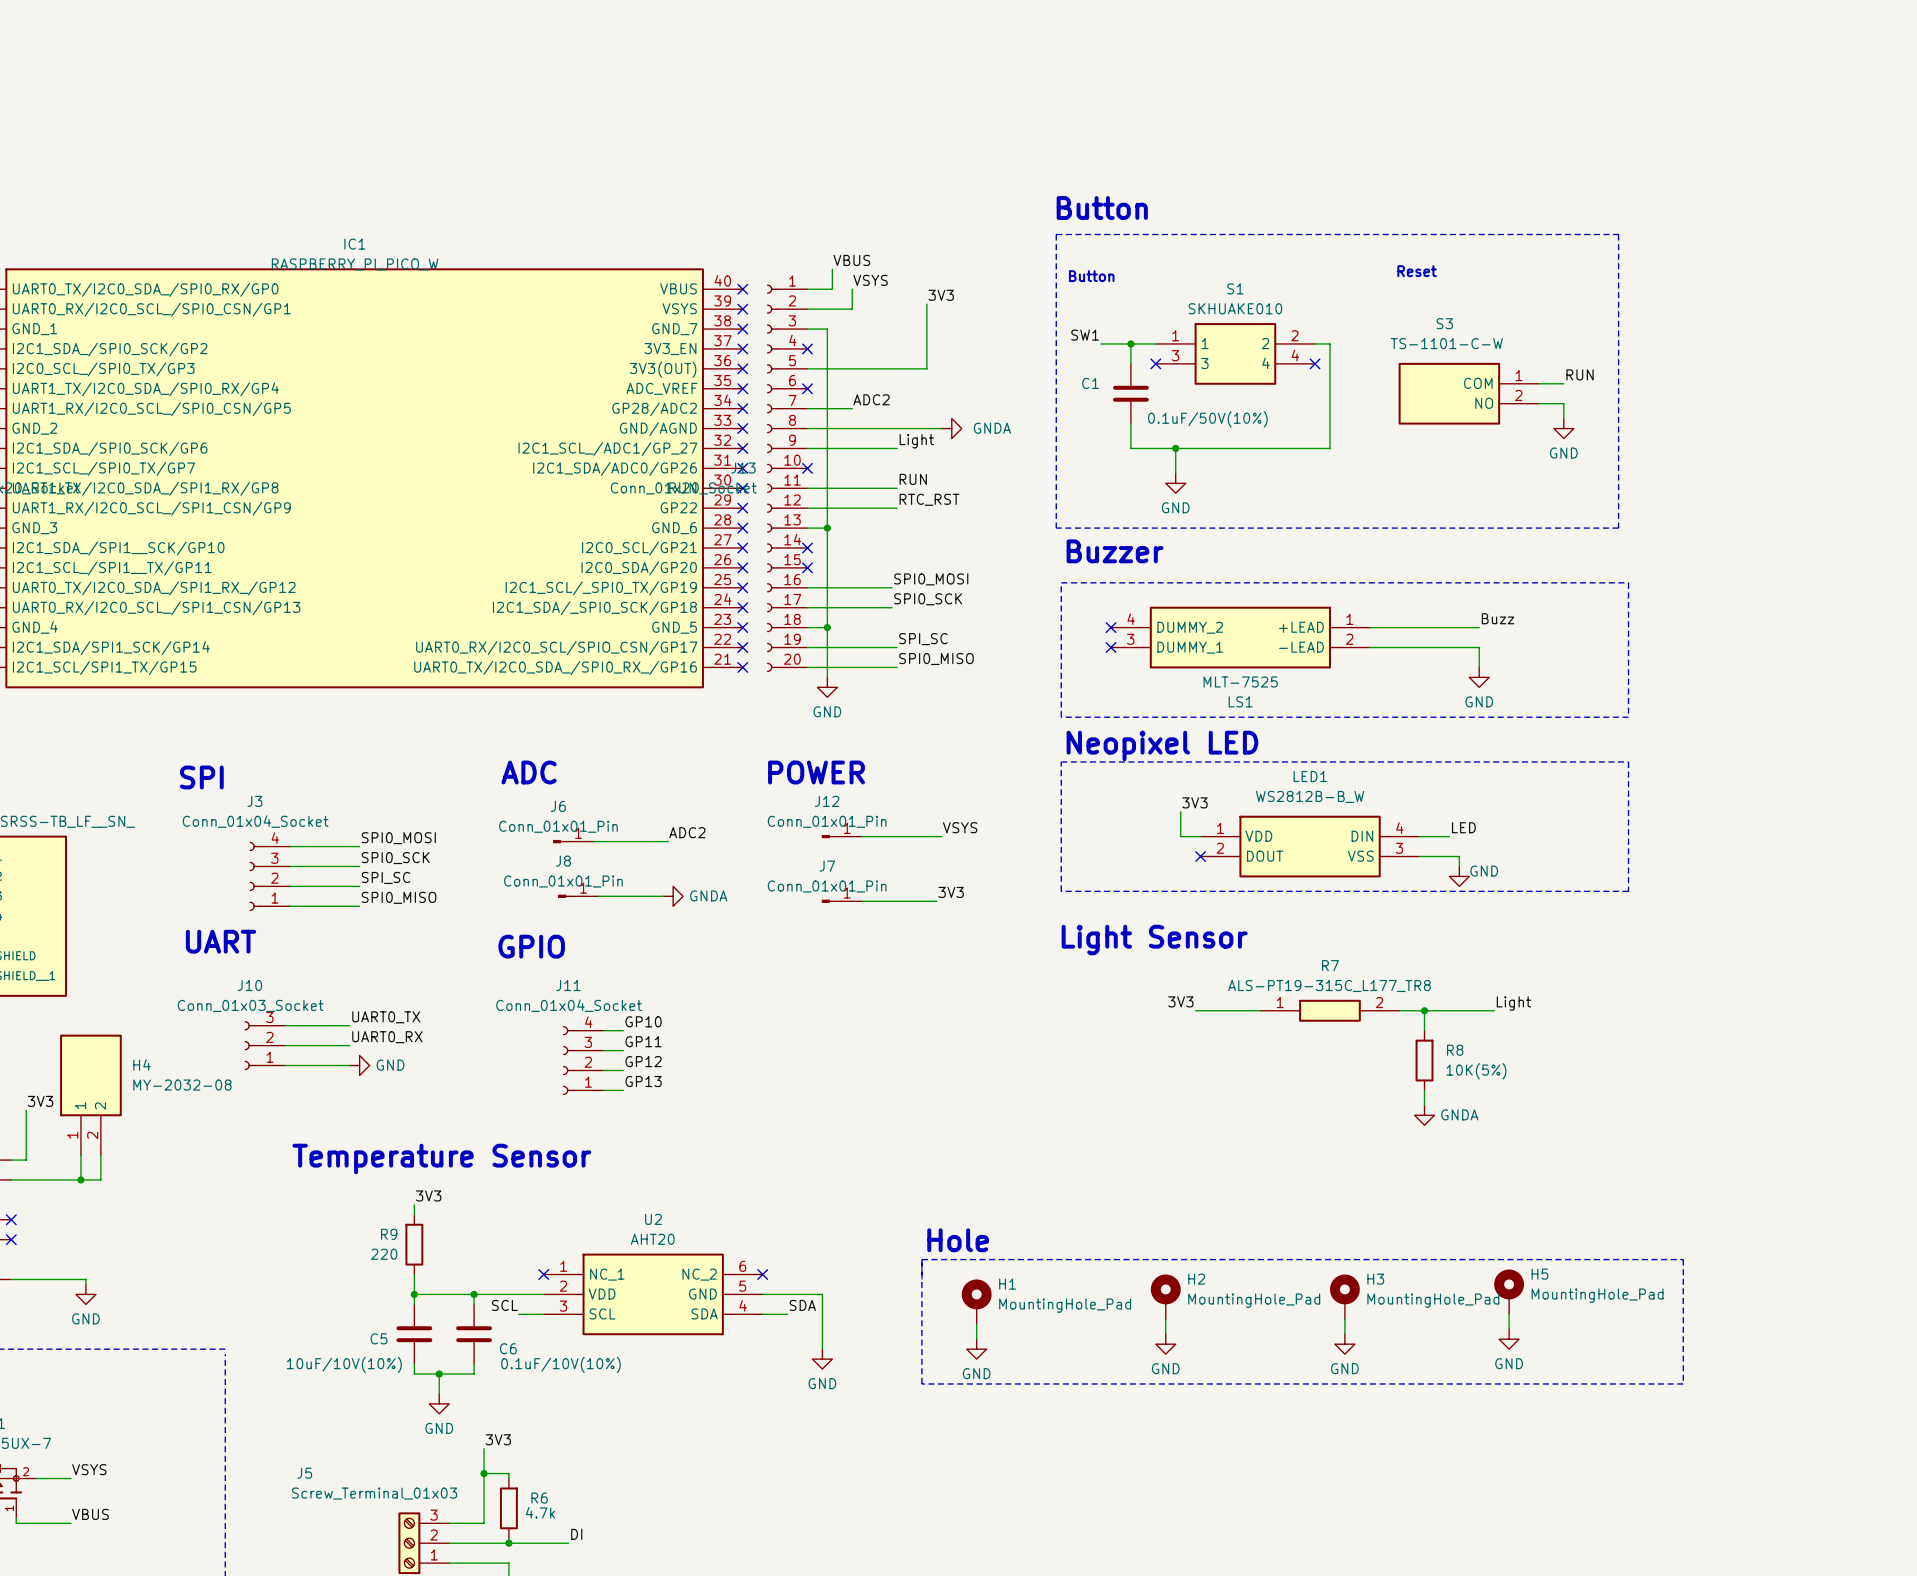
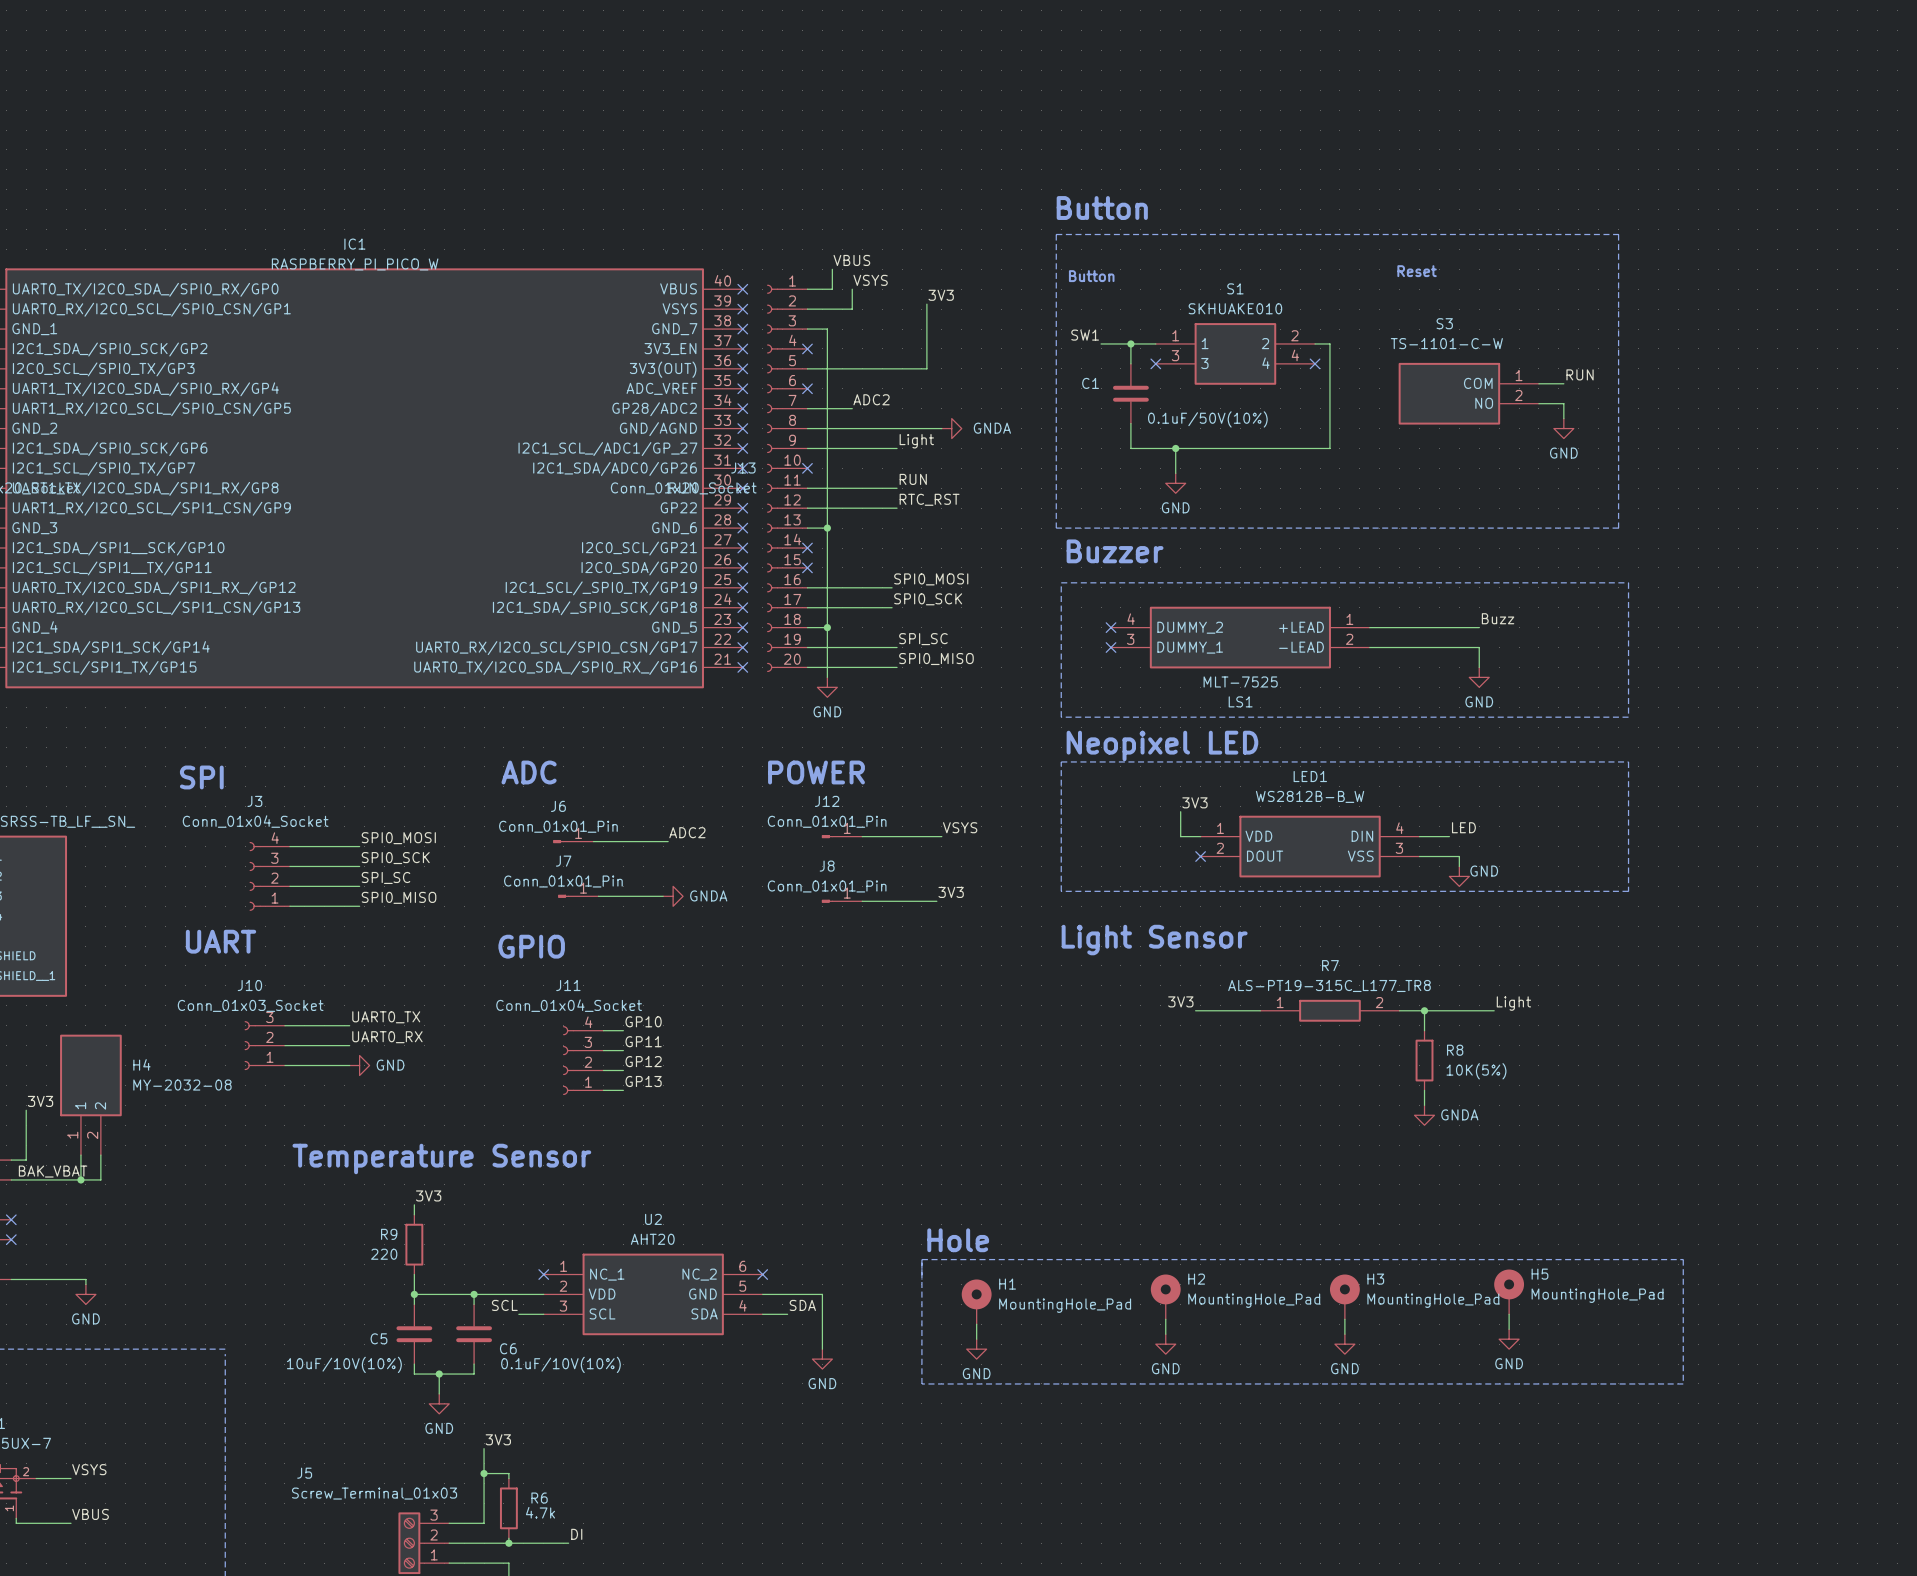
J8 name: J8 (563, 861) -> J7 (563, 861)
J7 name: J7 (827, 866) -> J8 (827, 866)
label: none -> BAK_VBAT (53, 1171)

